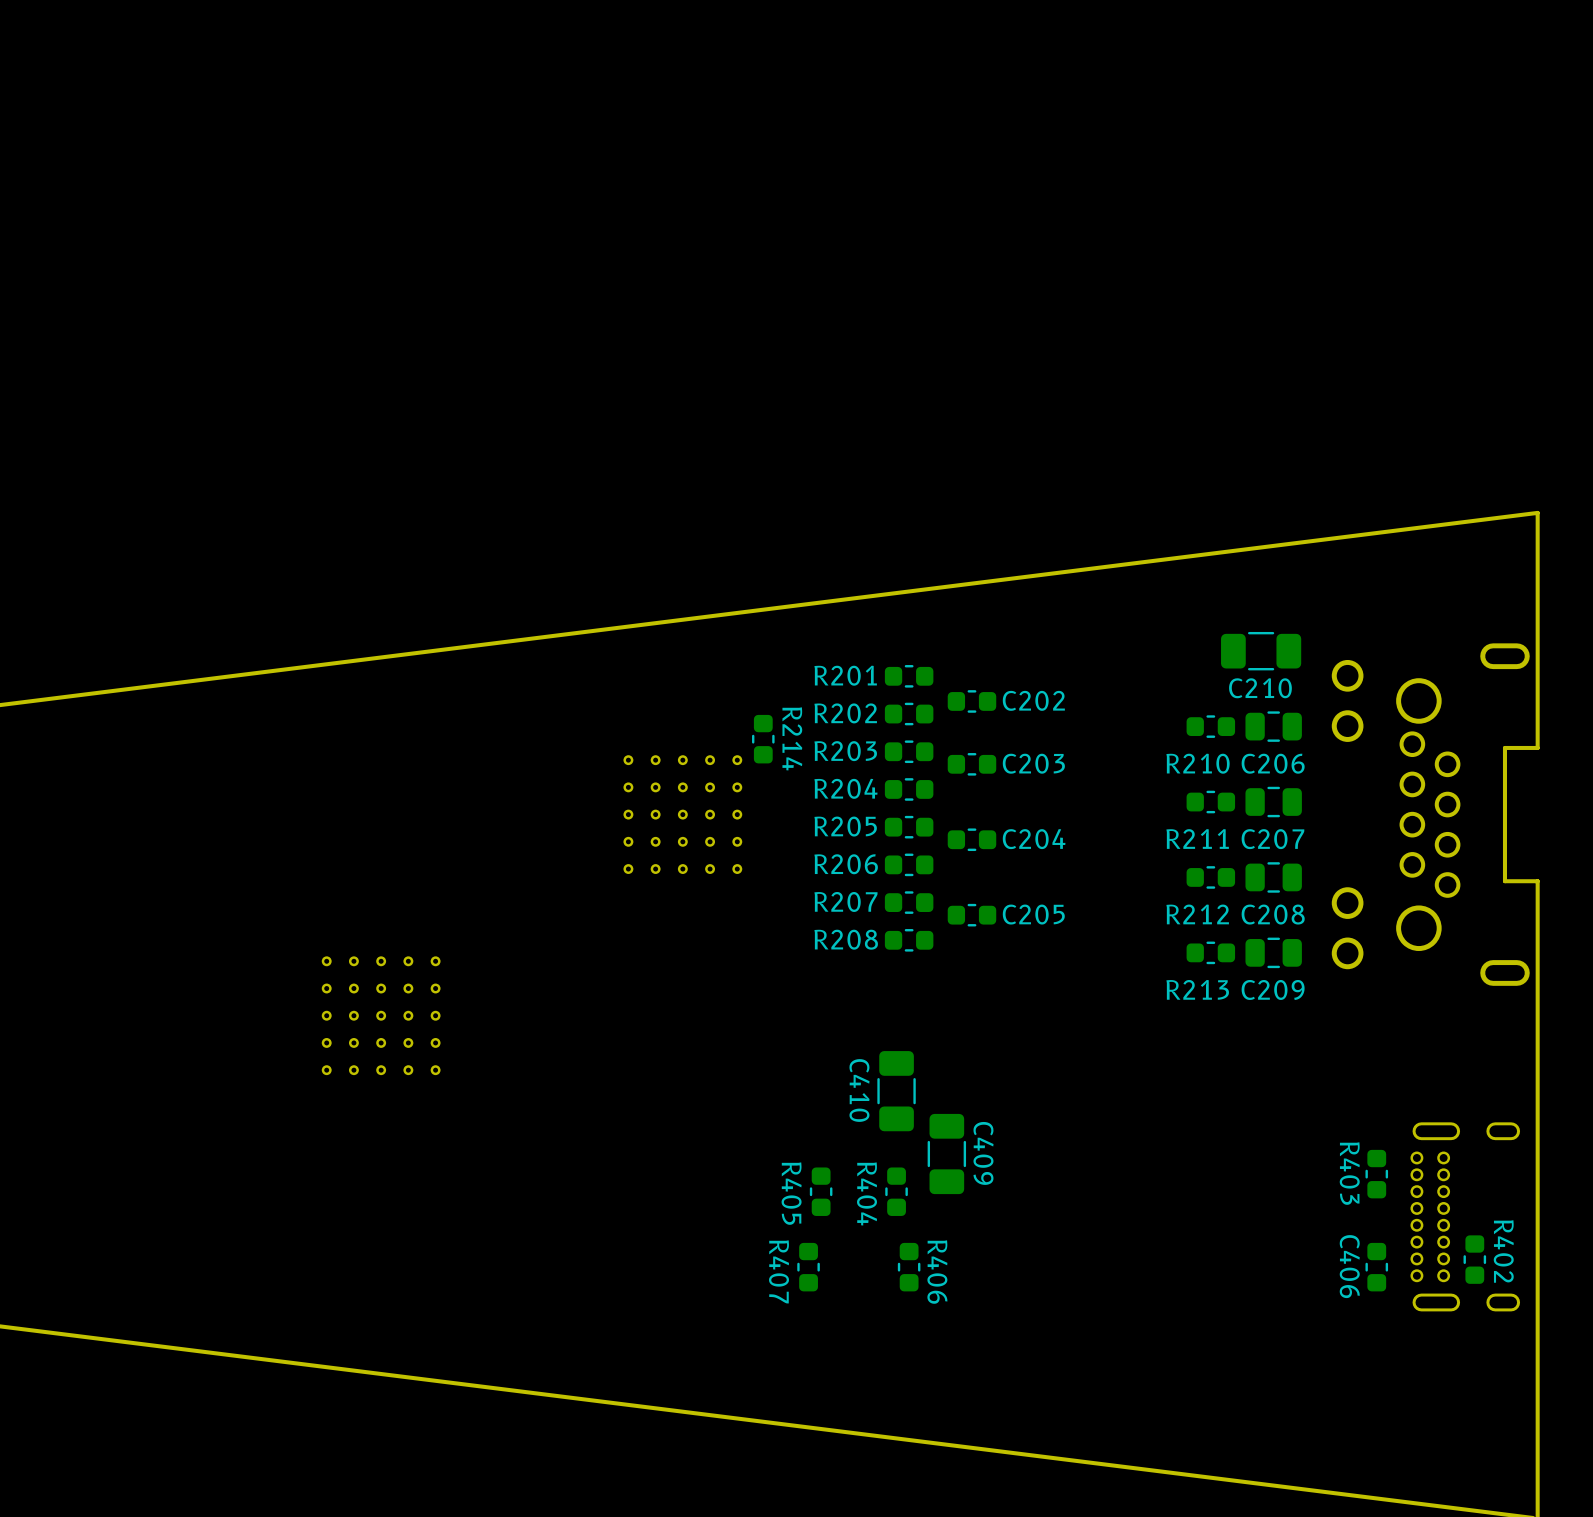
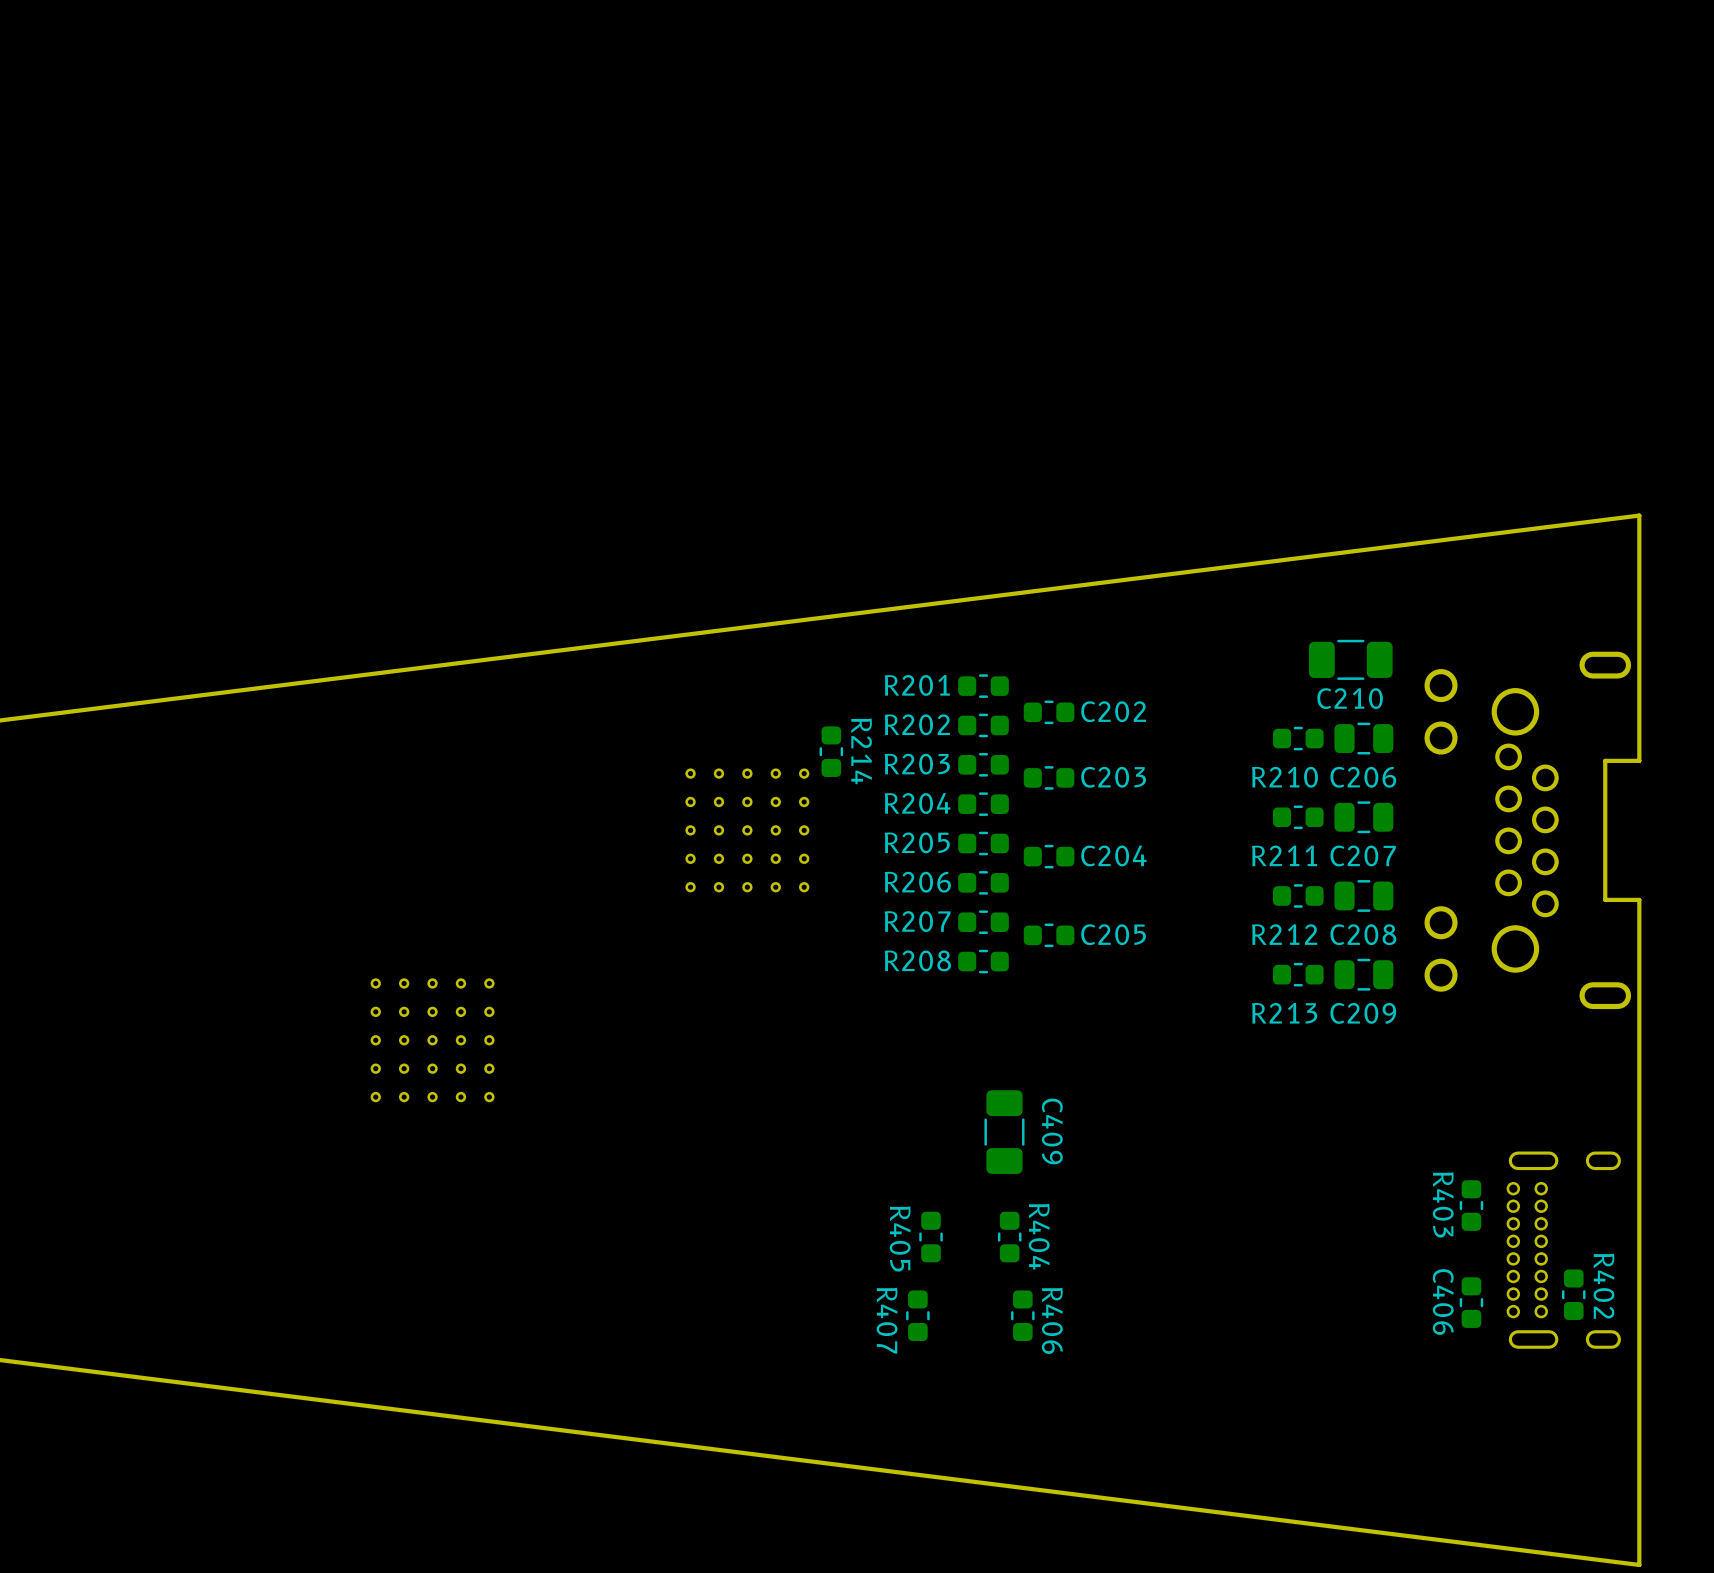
C410: (896, 1091) -> none
C409 name position: C409 (983, 1153) -> C409 (1052, 1131)
C409 position: (946, 1154) -> (1004, 1132)
R405 position: (821, 1191) -> (931, 1237)
R404 position: (896, 1191) -> (1009, 1237)
R404 name position: R404 (867, 1193) -> R404 (1039, 1236)
R407 position: (808, 1267) -> (917, 1315)
R406 position: (909, 1267) -> (1022, 1315)

